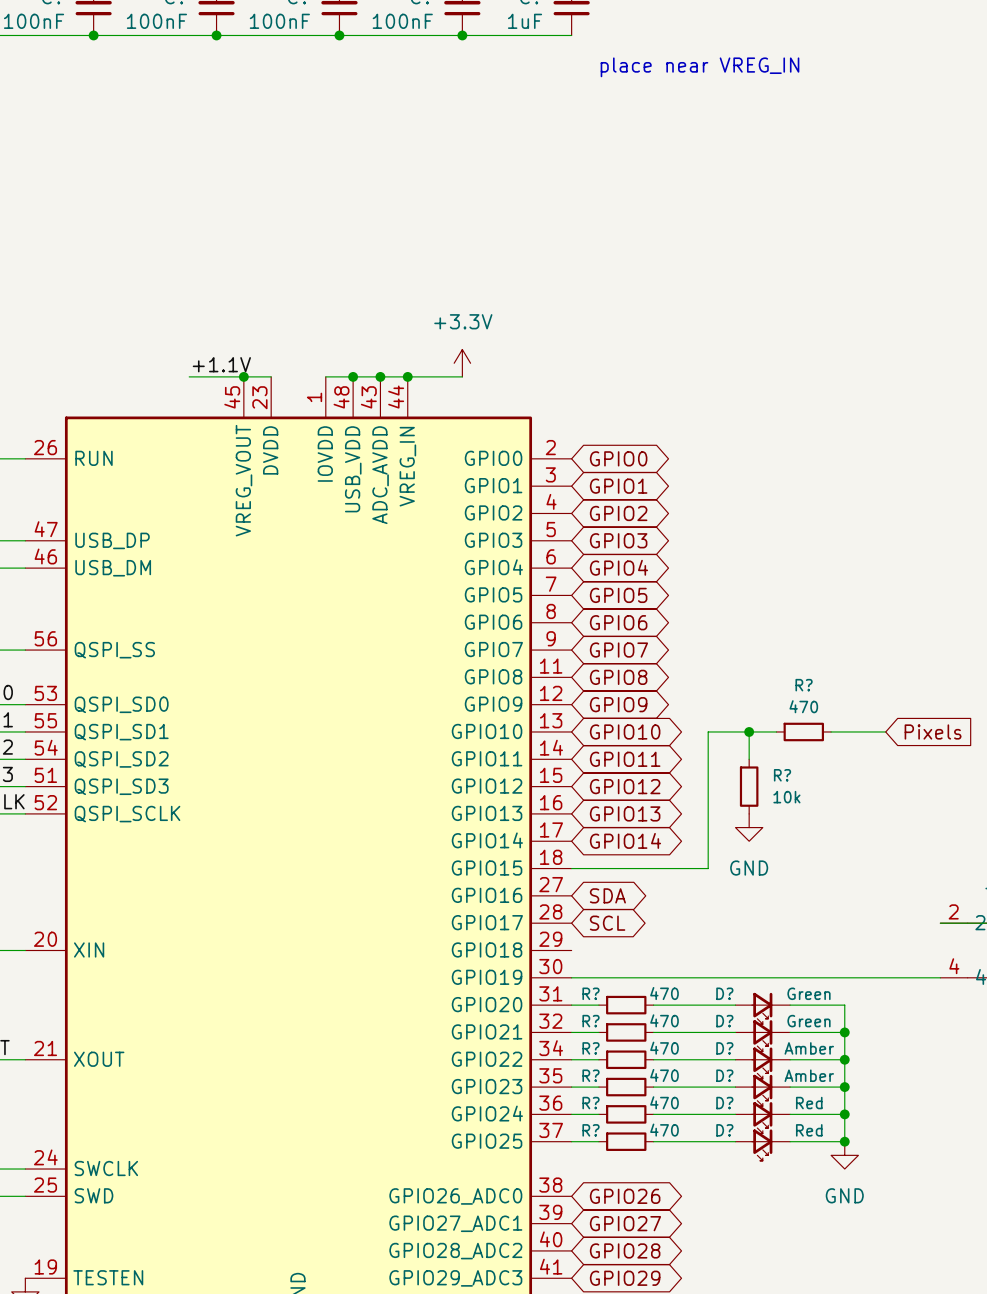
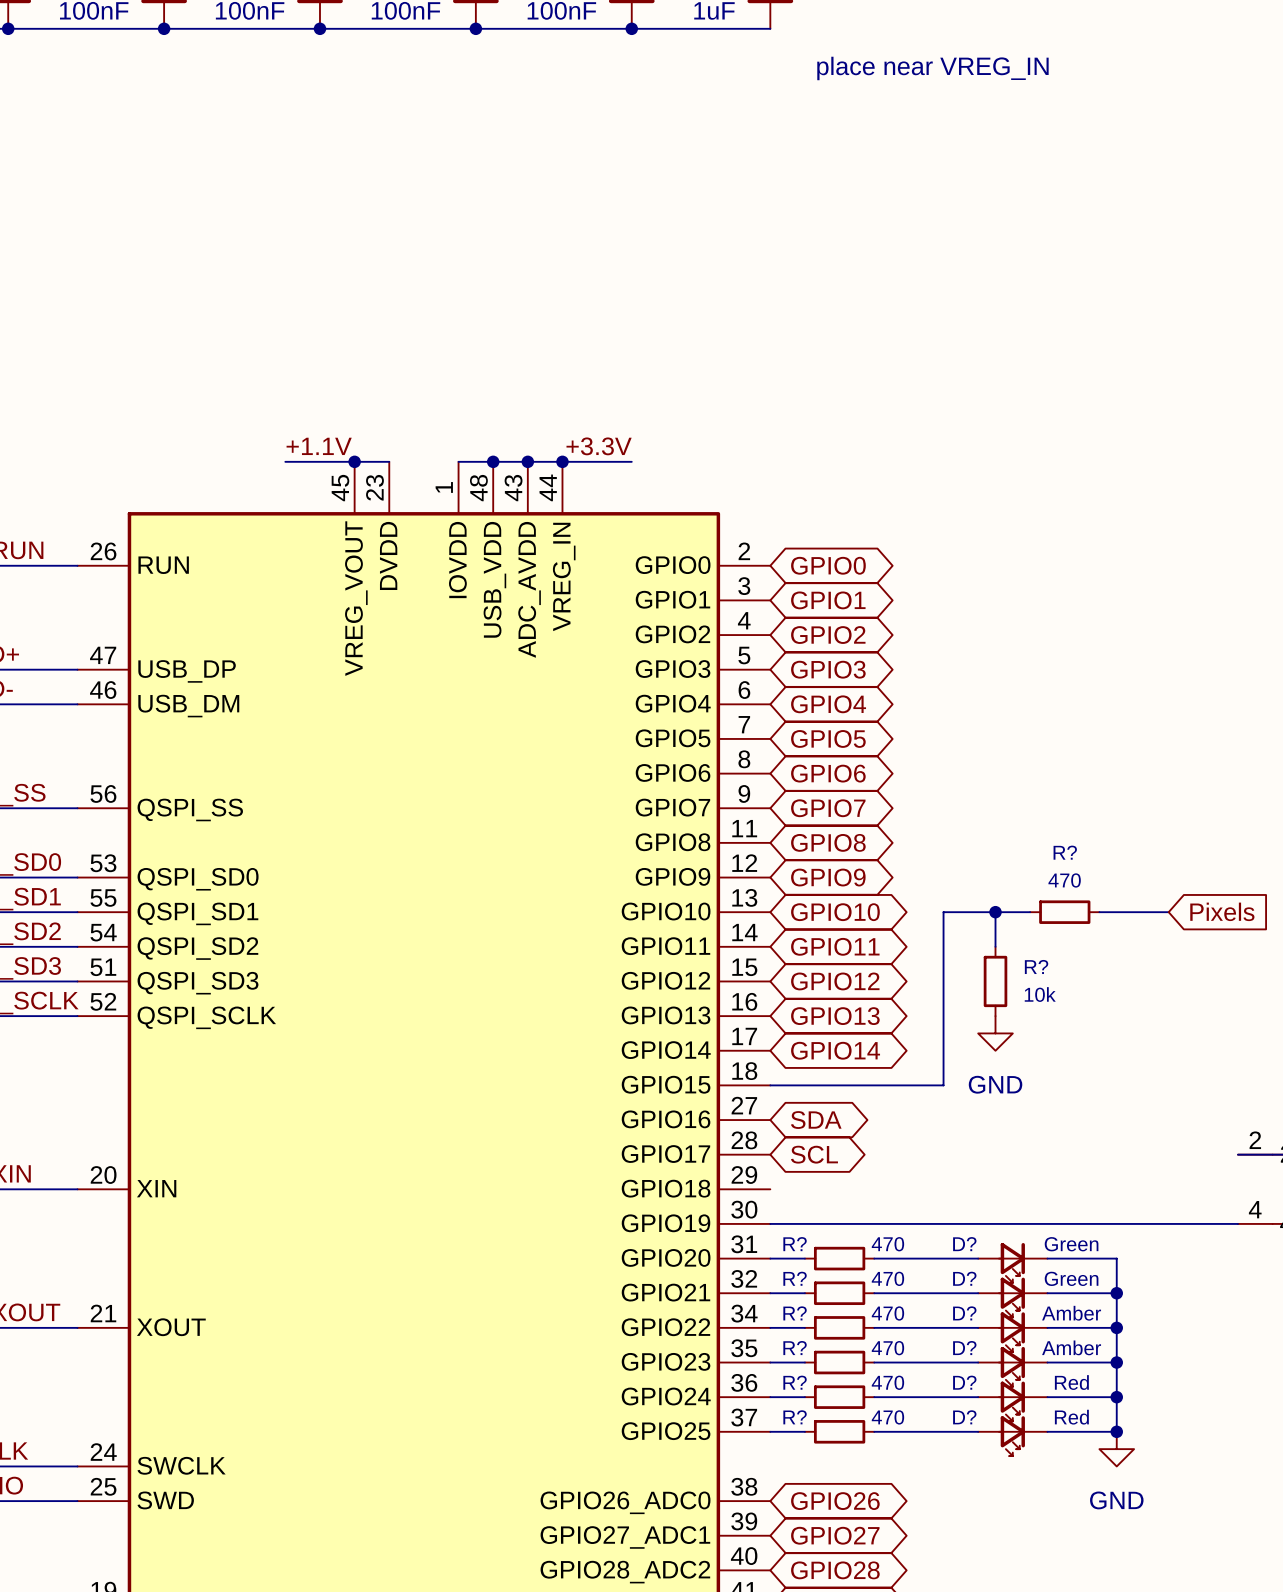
power symbol: +3.3V (462, 363) -> none
label: none -> +3.3V (599, 446)

